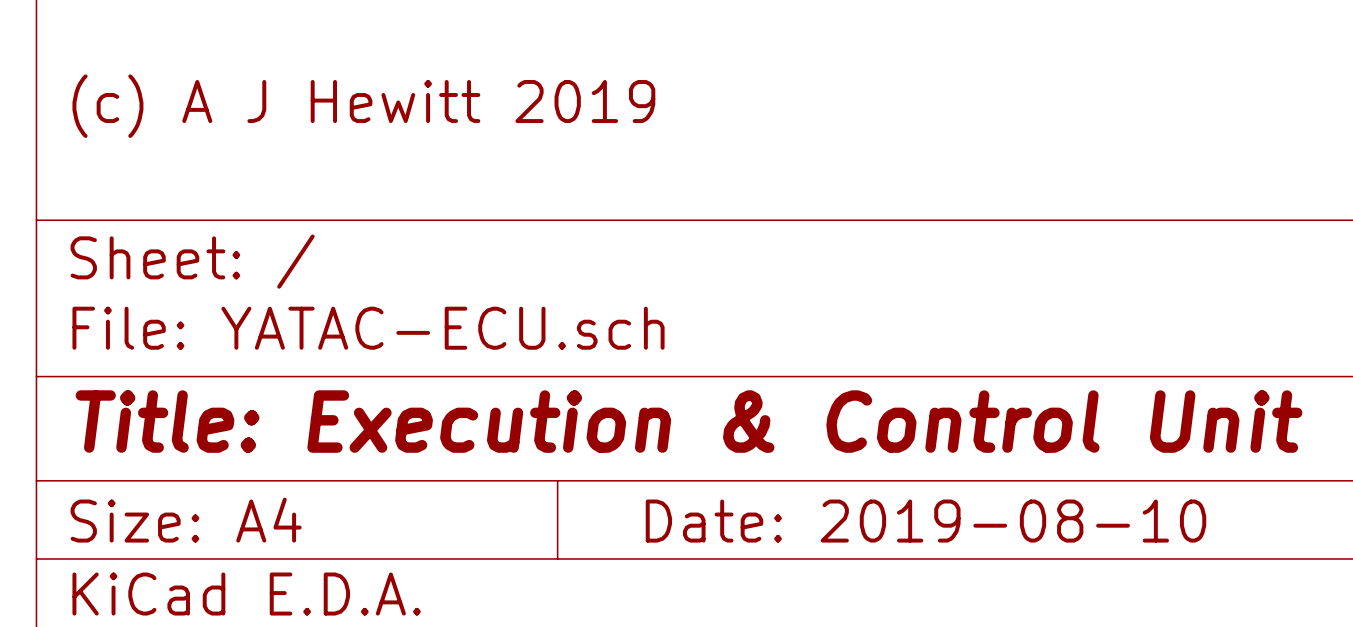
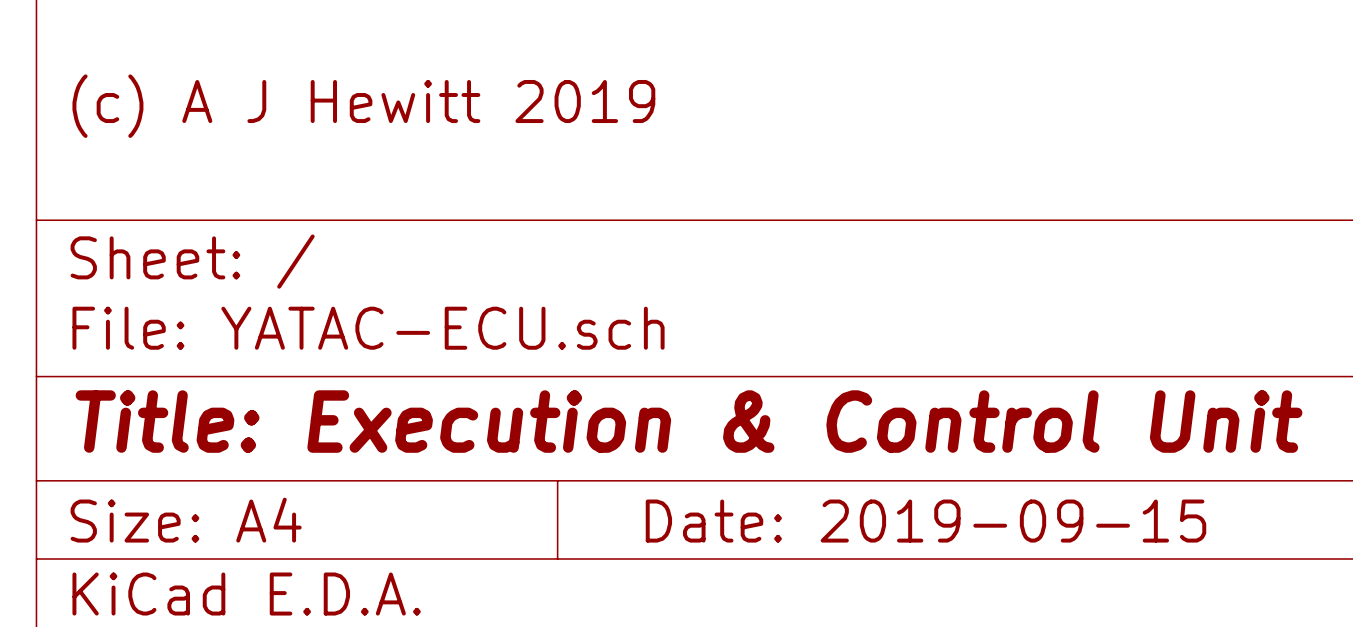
title block: Date: 2019-08-10 (925, 521) -> Date: 2019-09-15 (925, 521)

